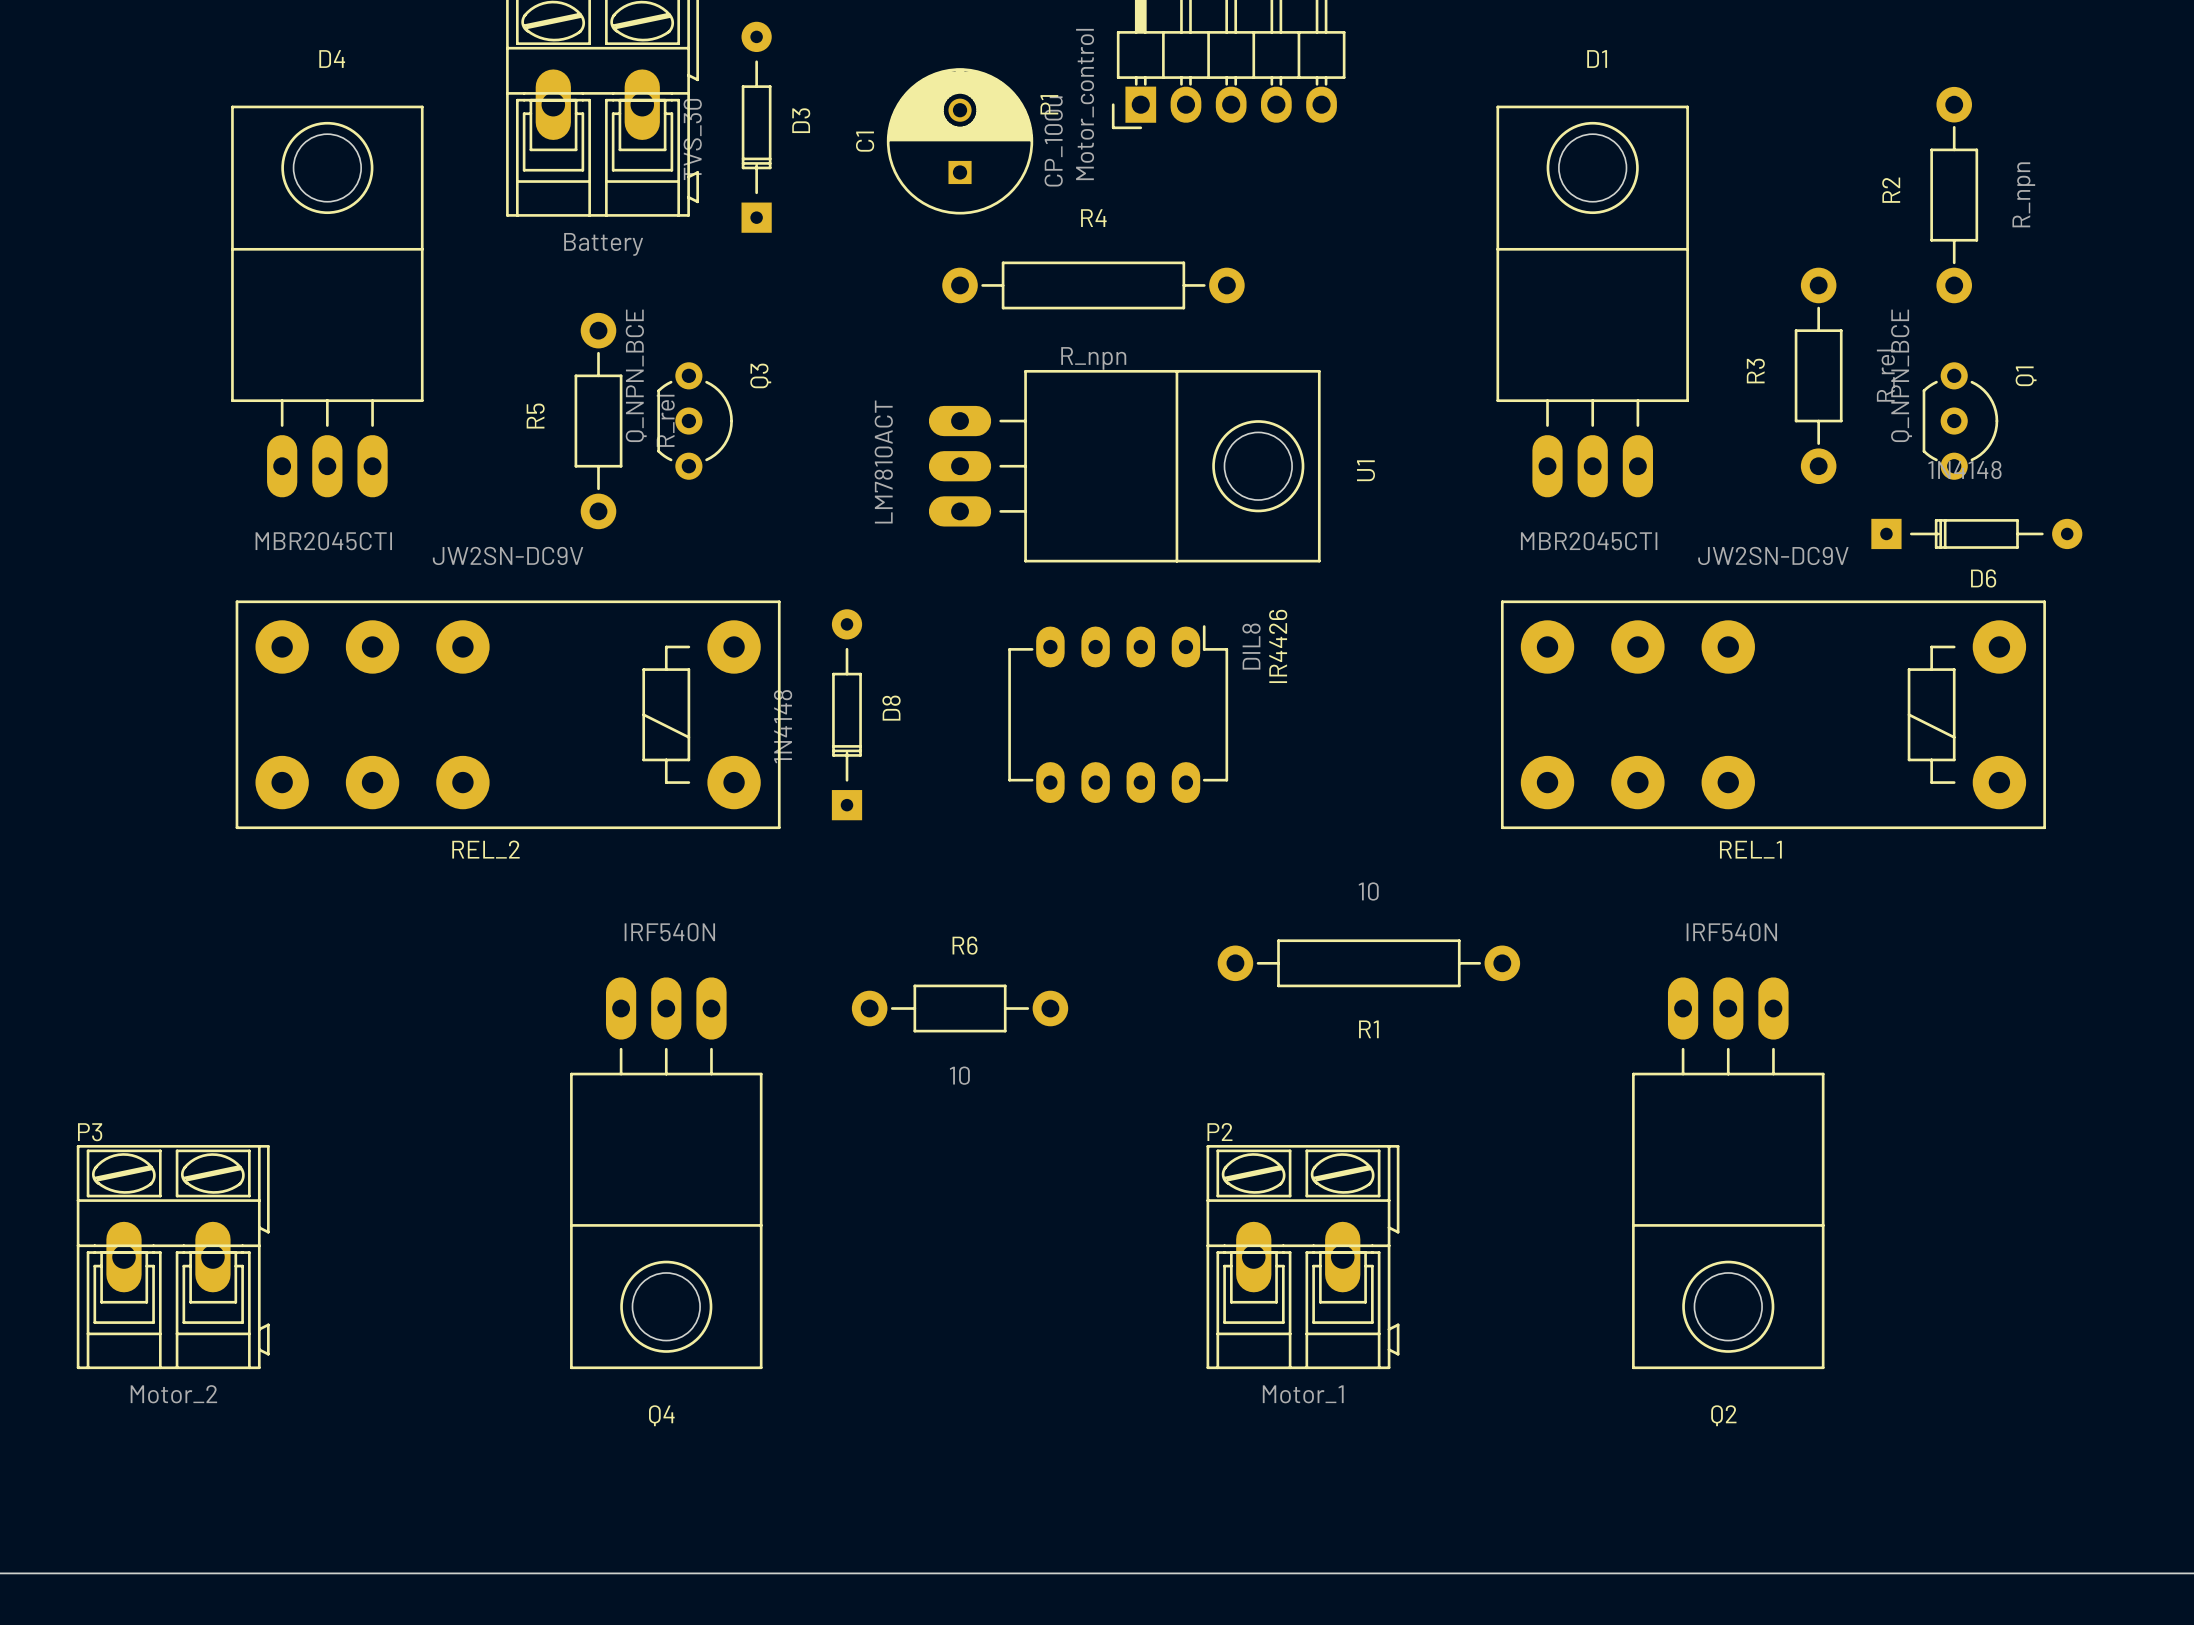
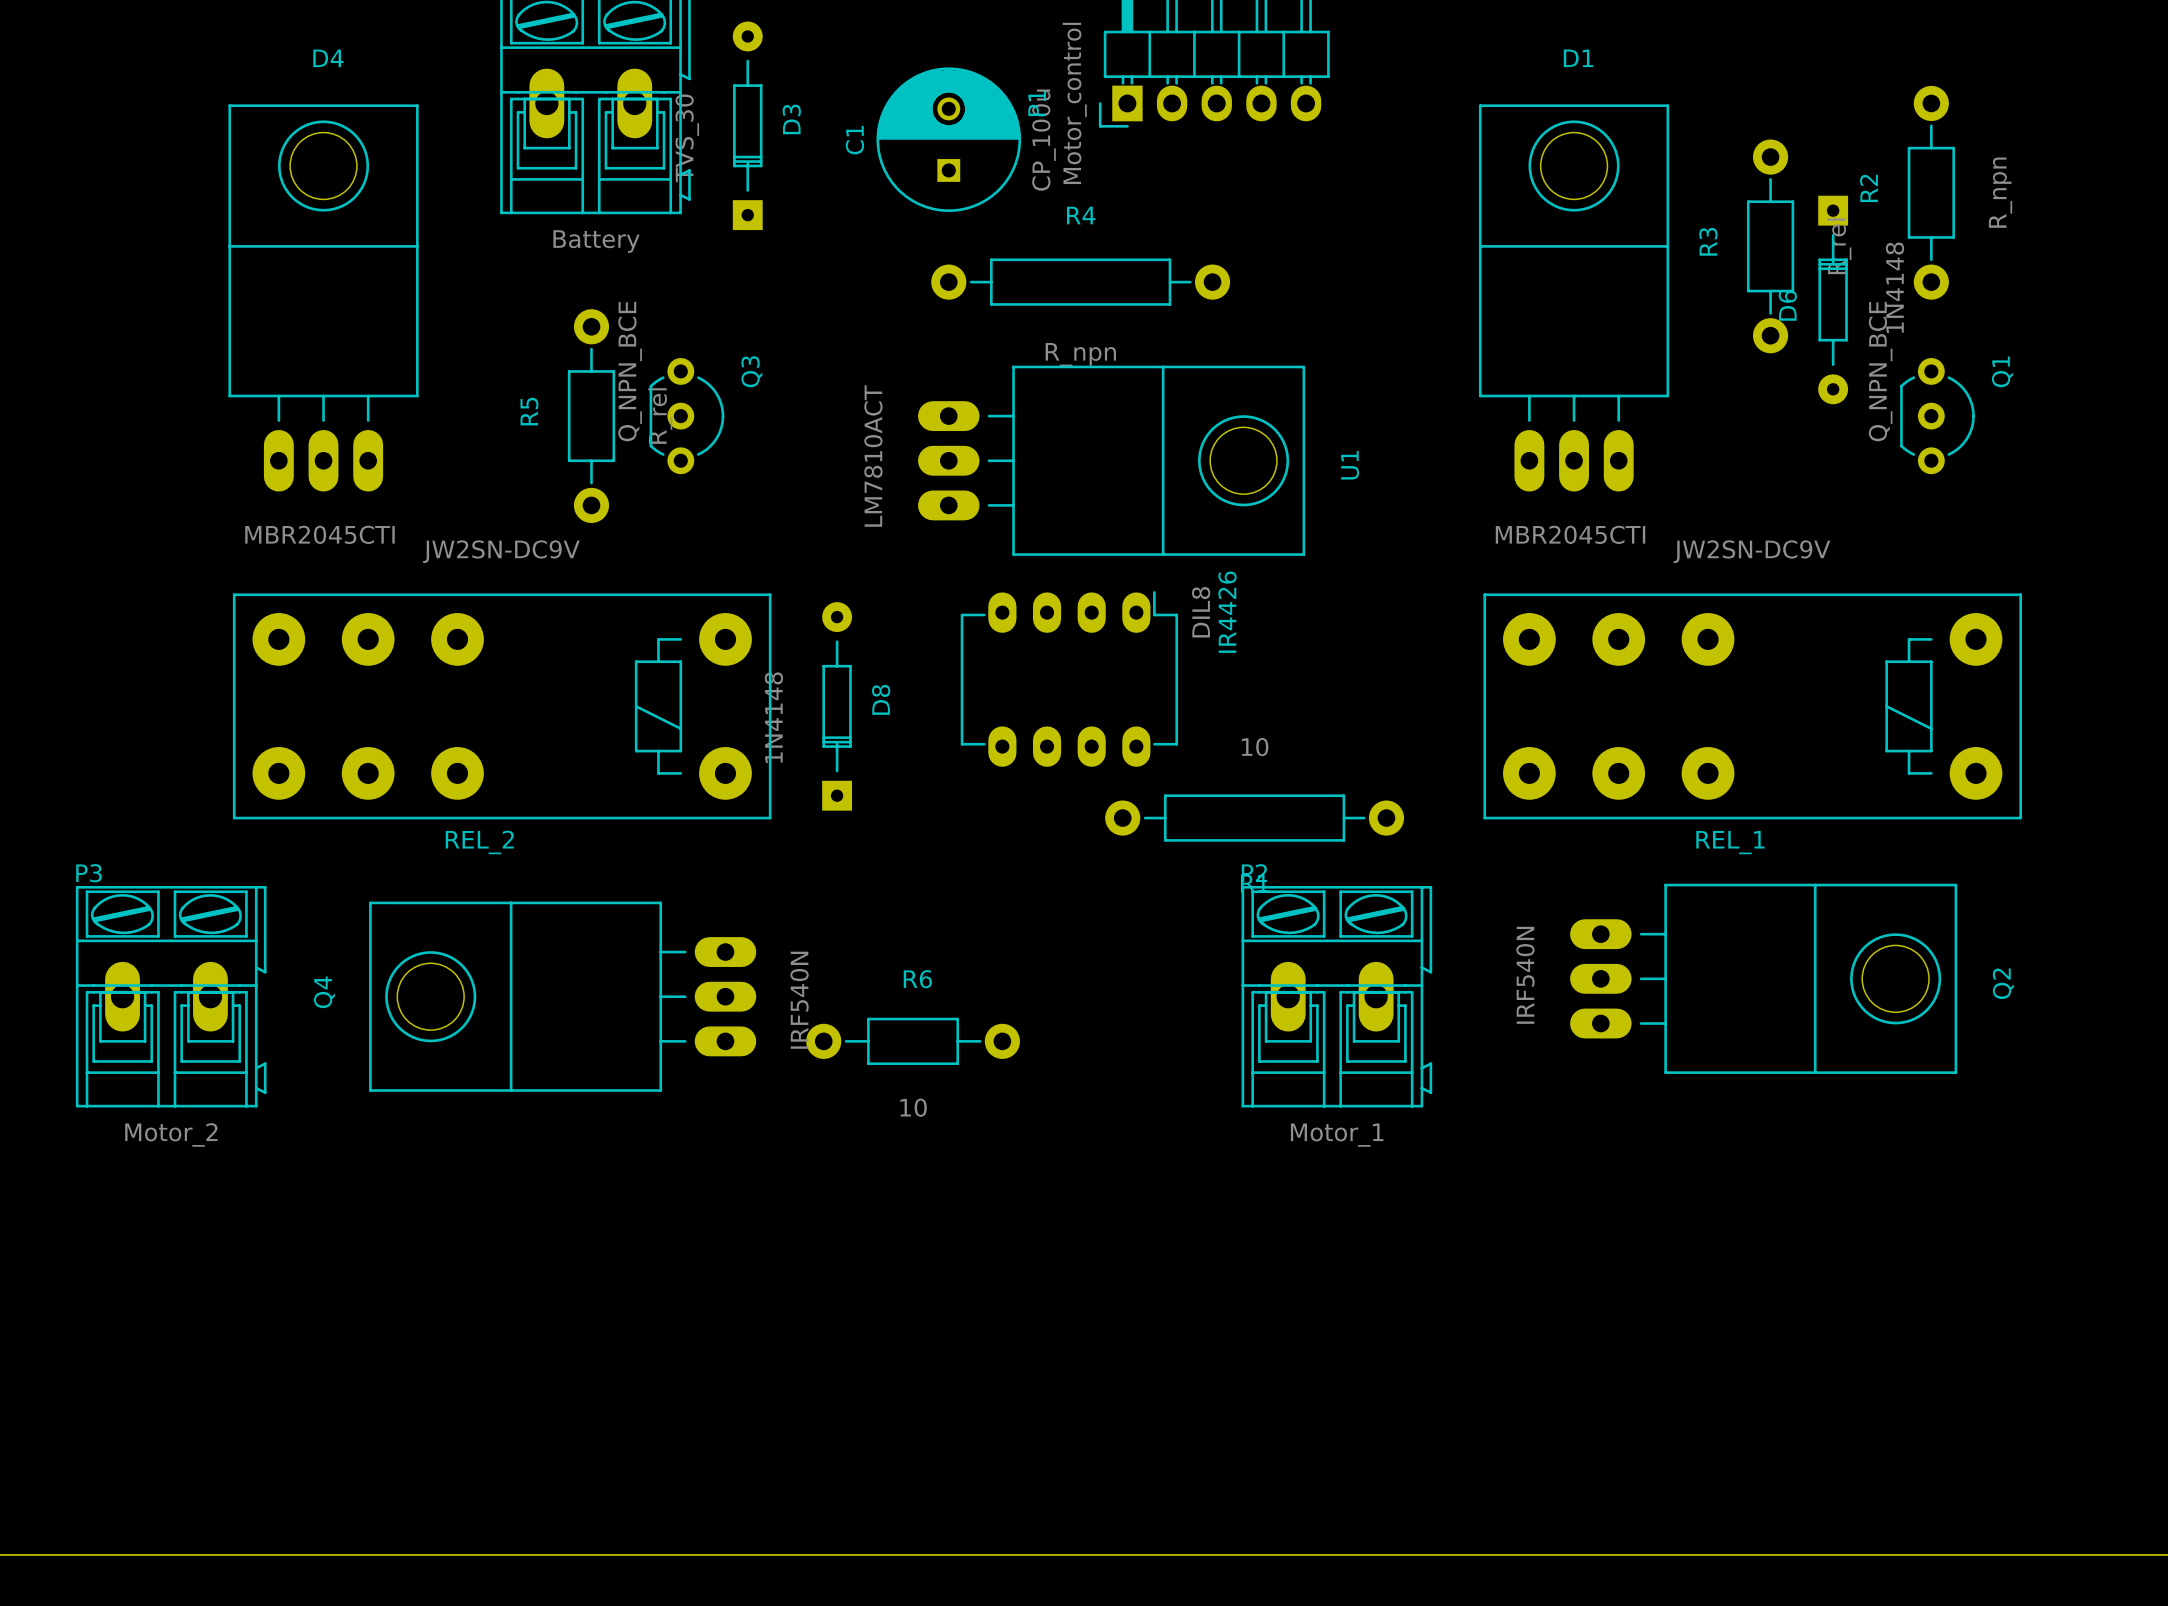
R3 position: (1818, 375) -> (1770, 246)
D6 rotation: 0° (1976, 533) -> 90° clockwise (1833, 299)
D6 position: (1976, 533) -> (1833, 299)
IR4426 position: (1118, 714) -> (1069, 678)
R1 position: (1368, 963) -> (1254, 818)
R6 position: (960, 1008) -> (913, 1041)
Q4 rotation: 0° (666, 1173) -> 90° clockwise (562, 996)
Q2 rotation: 0° (1728, 1173) -> 90° counterclockwise (1763, 978)
P3 position: (173, 1257) -> (171, 996)
P2 position: (1302, 1257) -> (1336, 996)

